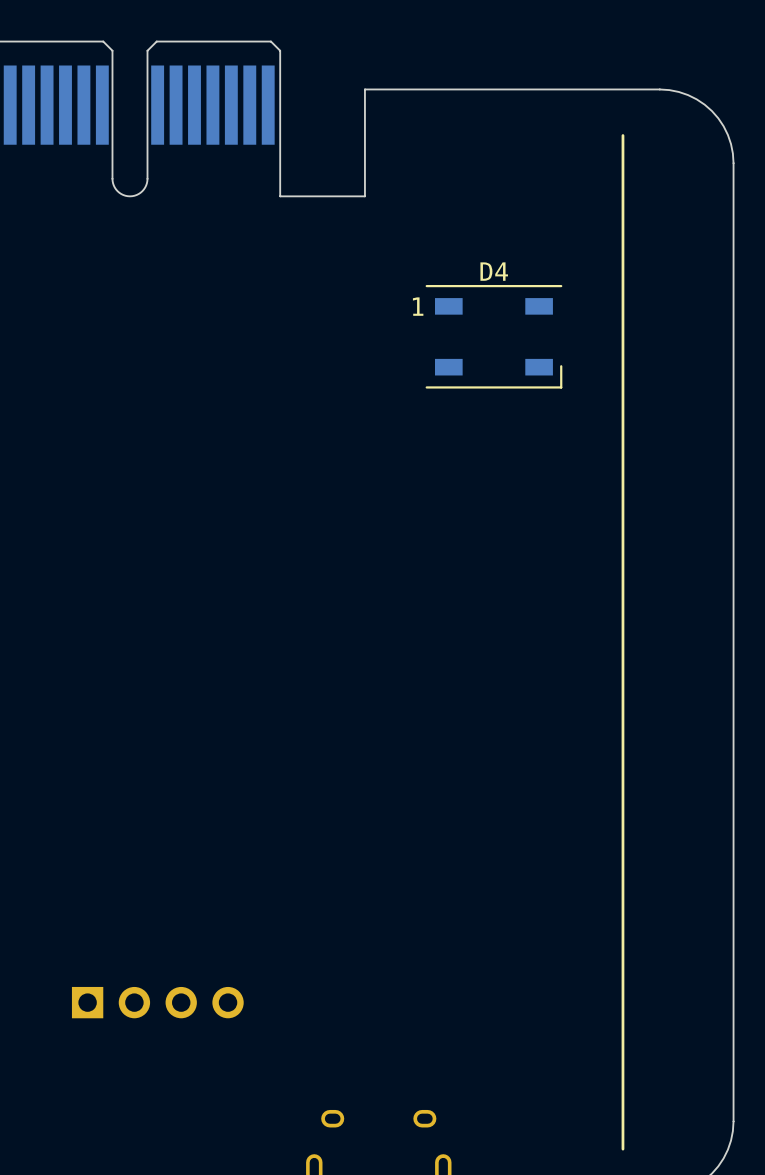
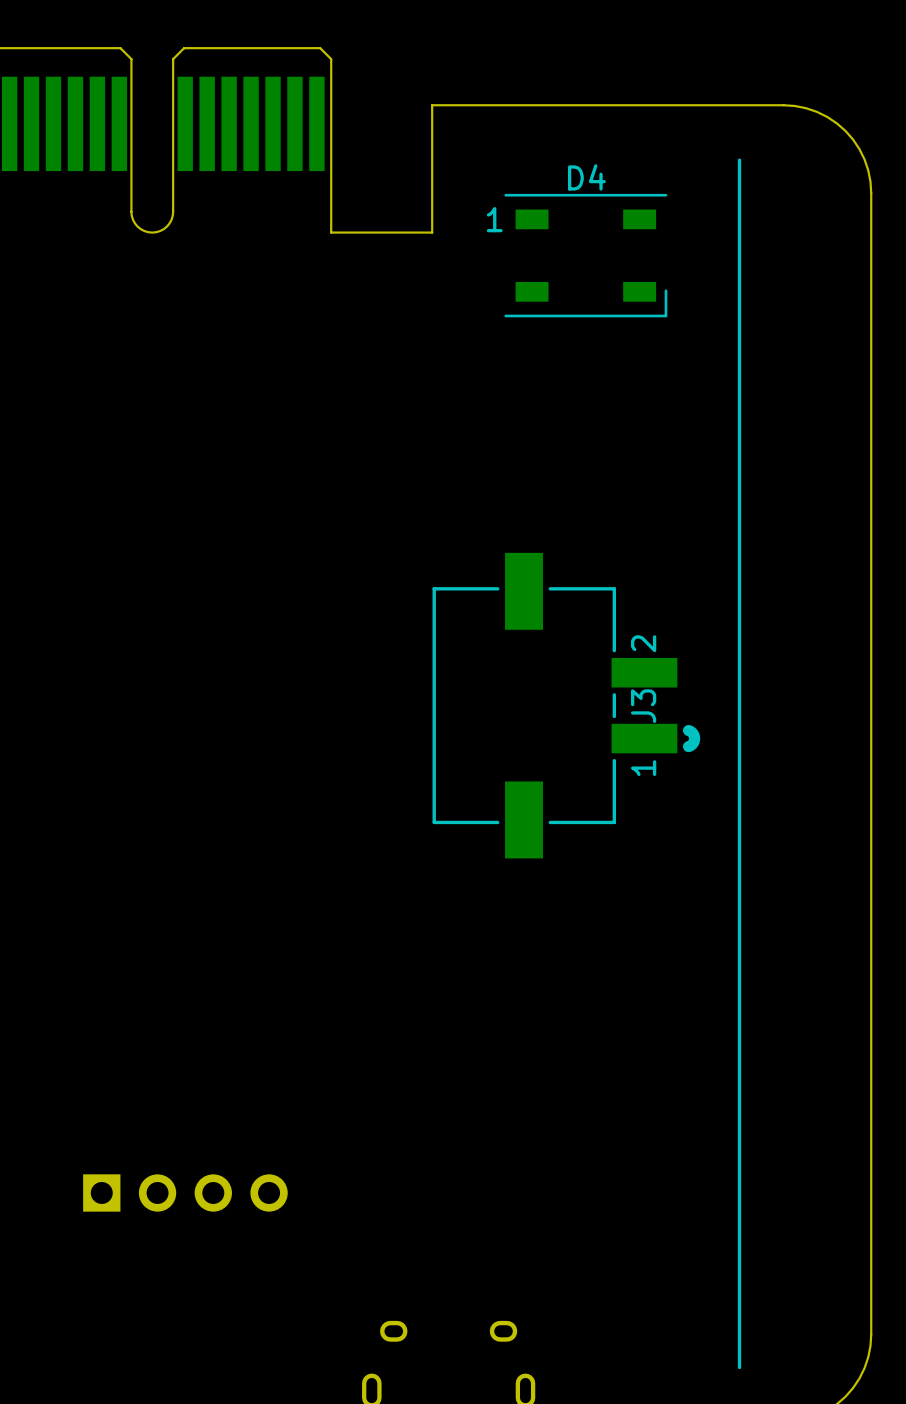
D4 position: (493, 336) -> (585, 255)
J3: none -> (566, 705)

